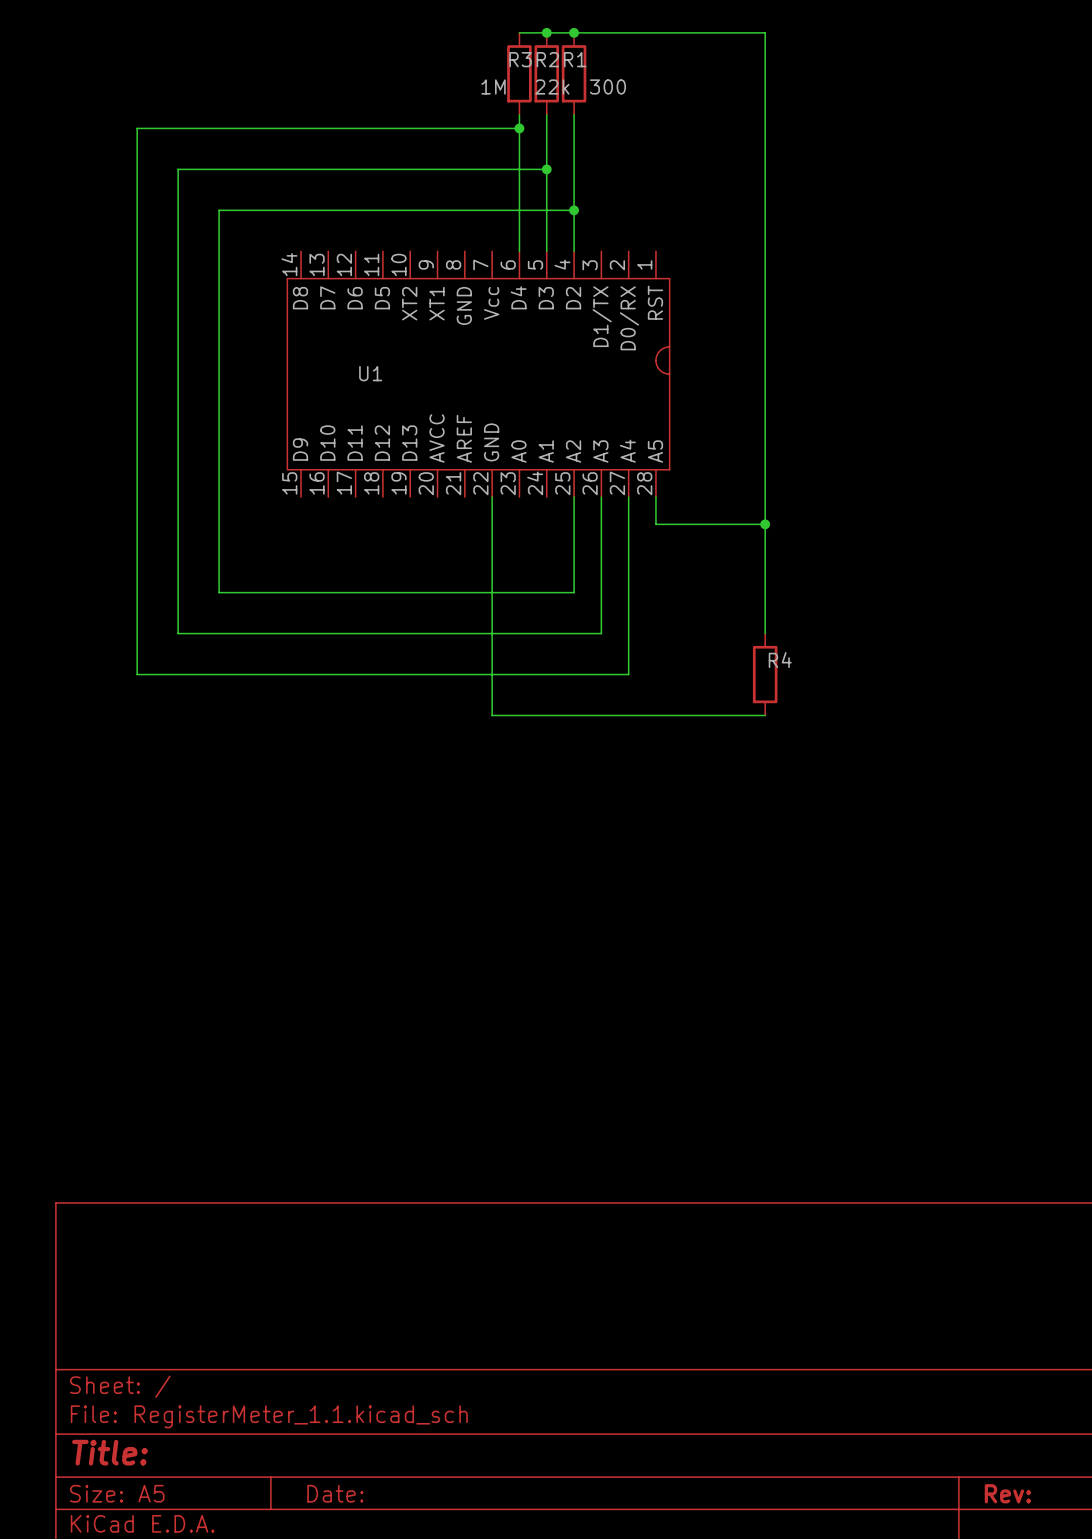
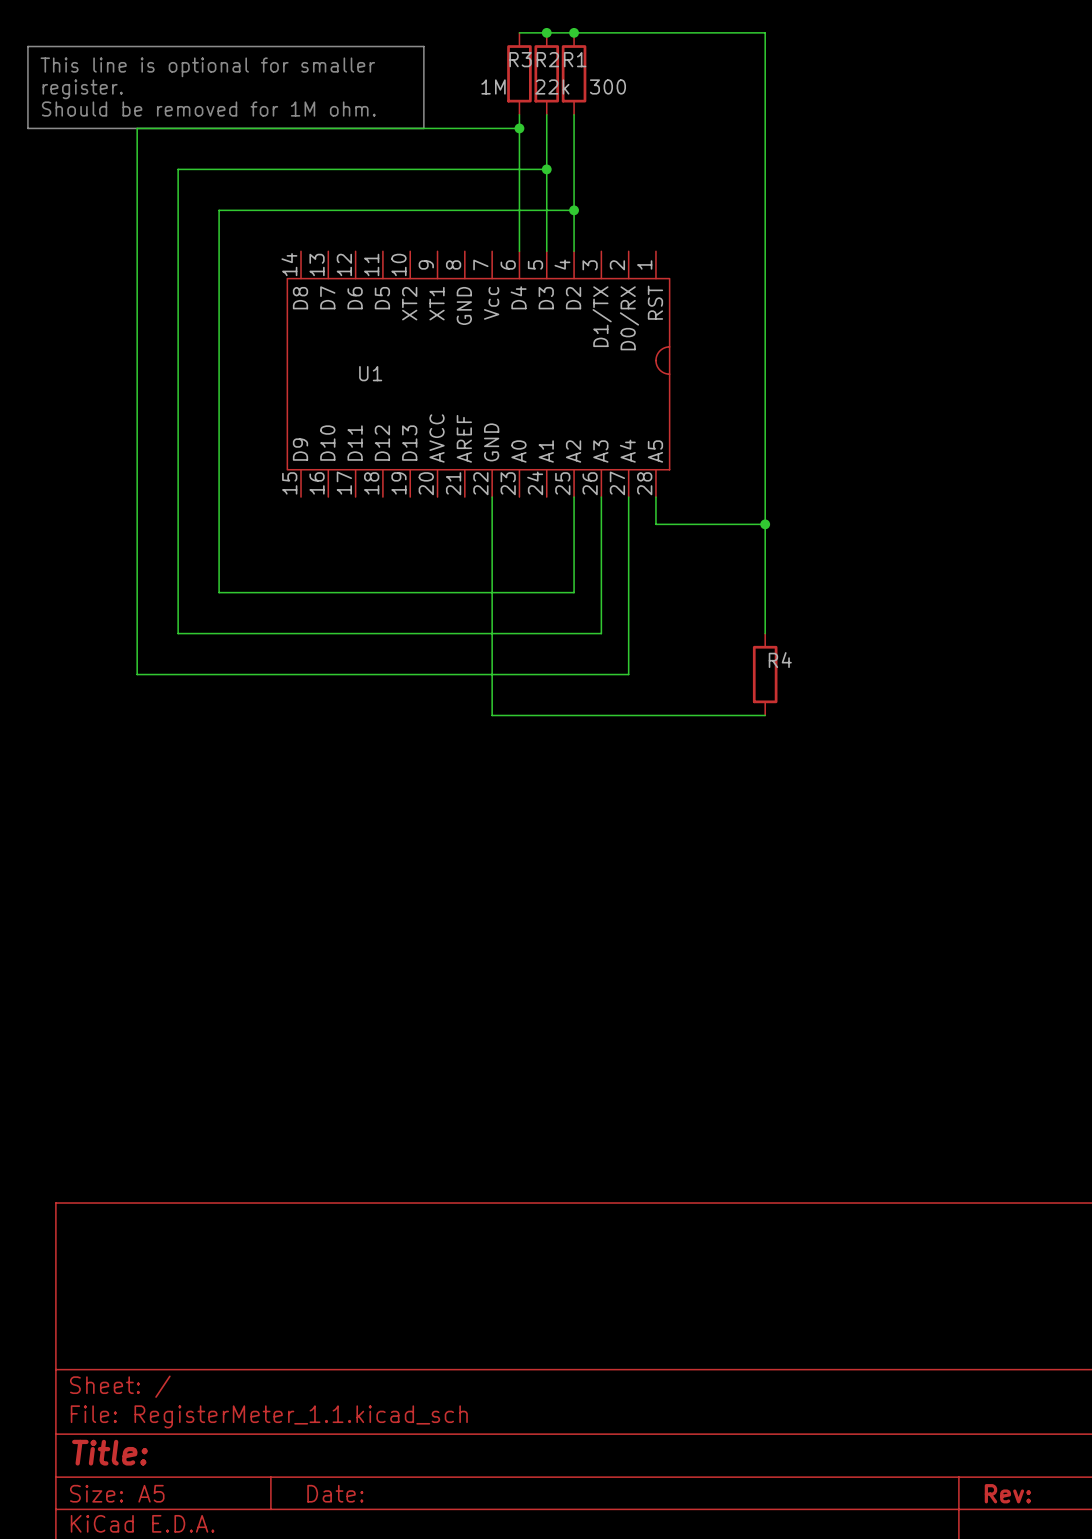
line: none -> (27, 46) (423, 46) (423, 128) (27, 128) (27, 46)
text: none -> This line is optional for smaller (207, 67)
text: none -> register. (82, 89)
text: none -> Should be removed for 1M ohm. (208, 109)

